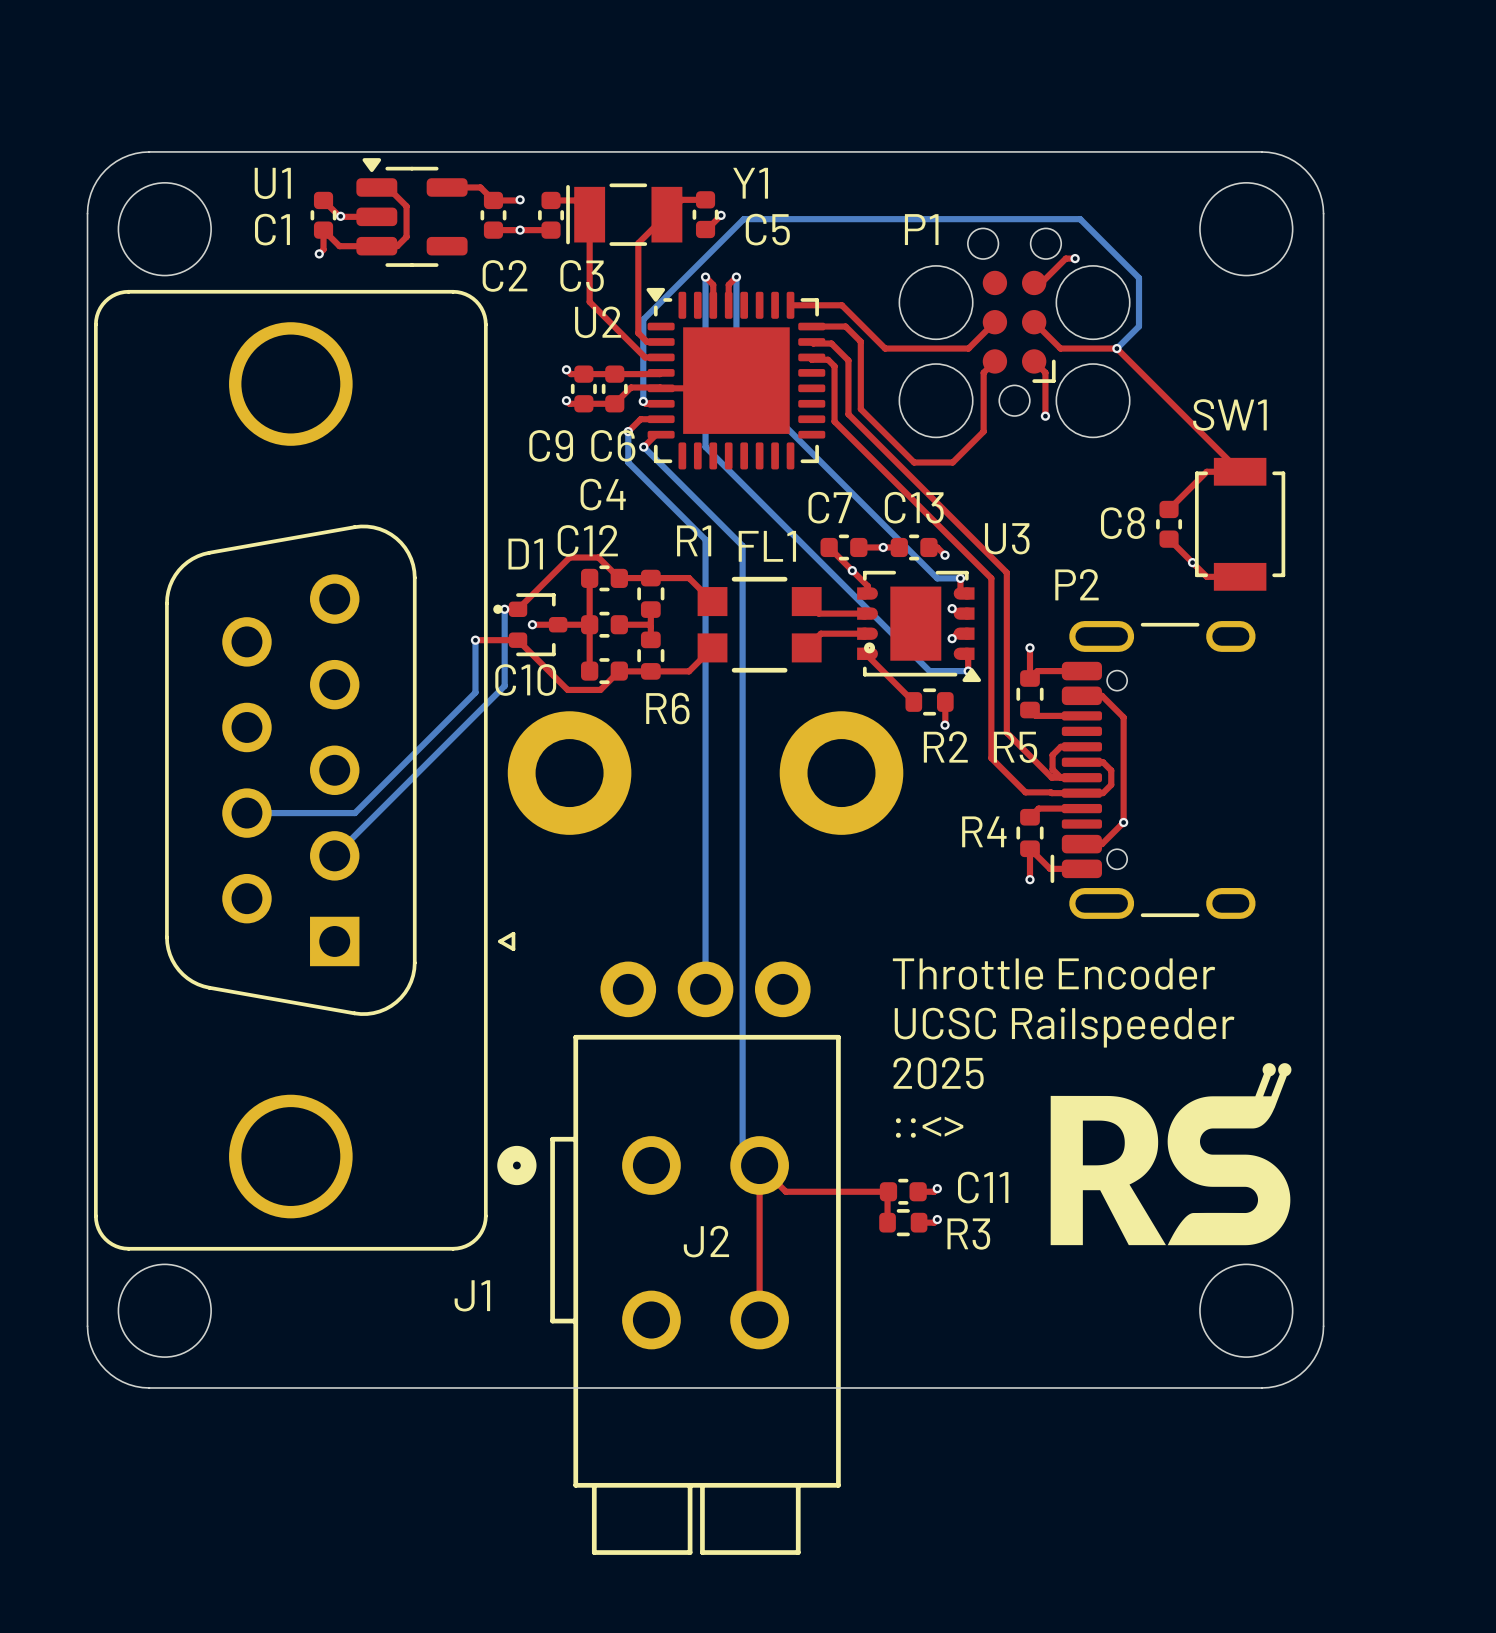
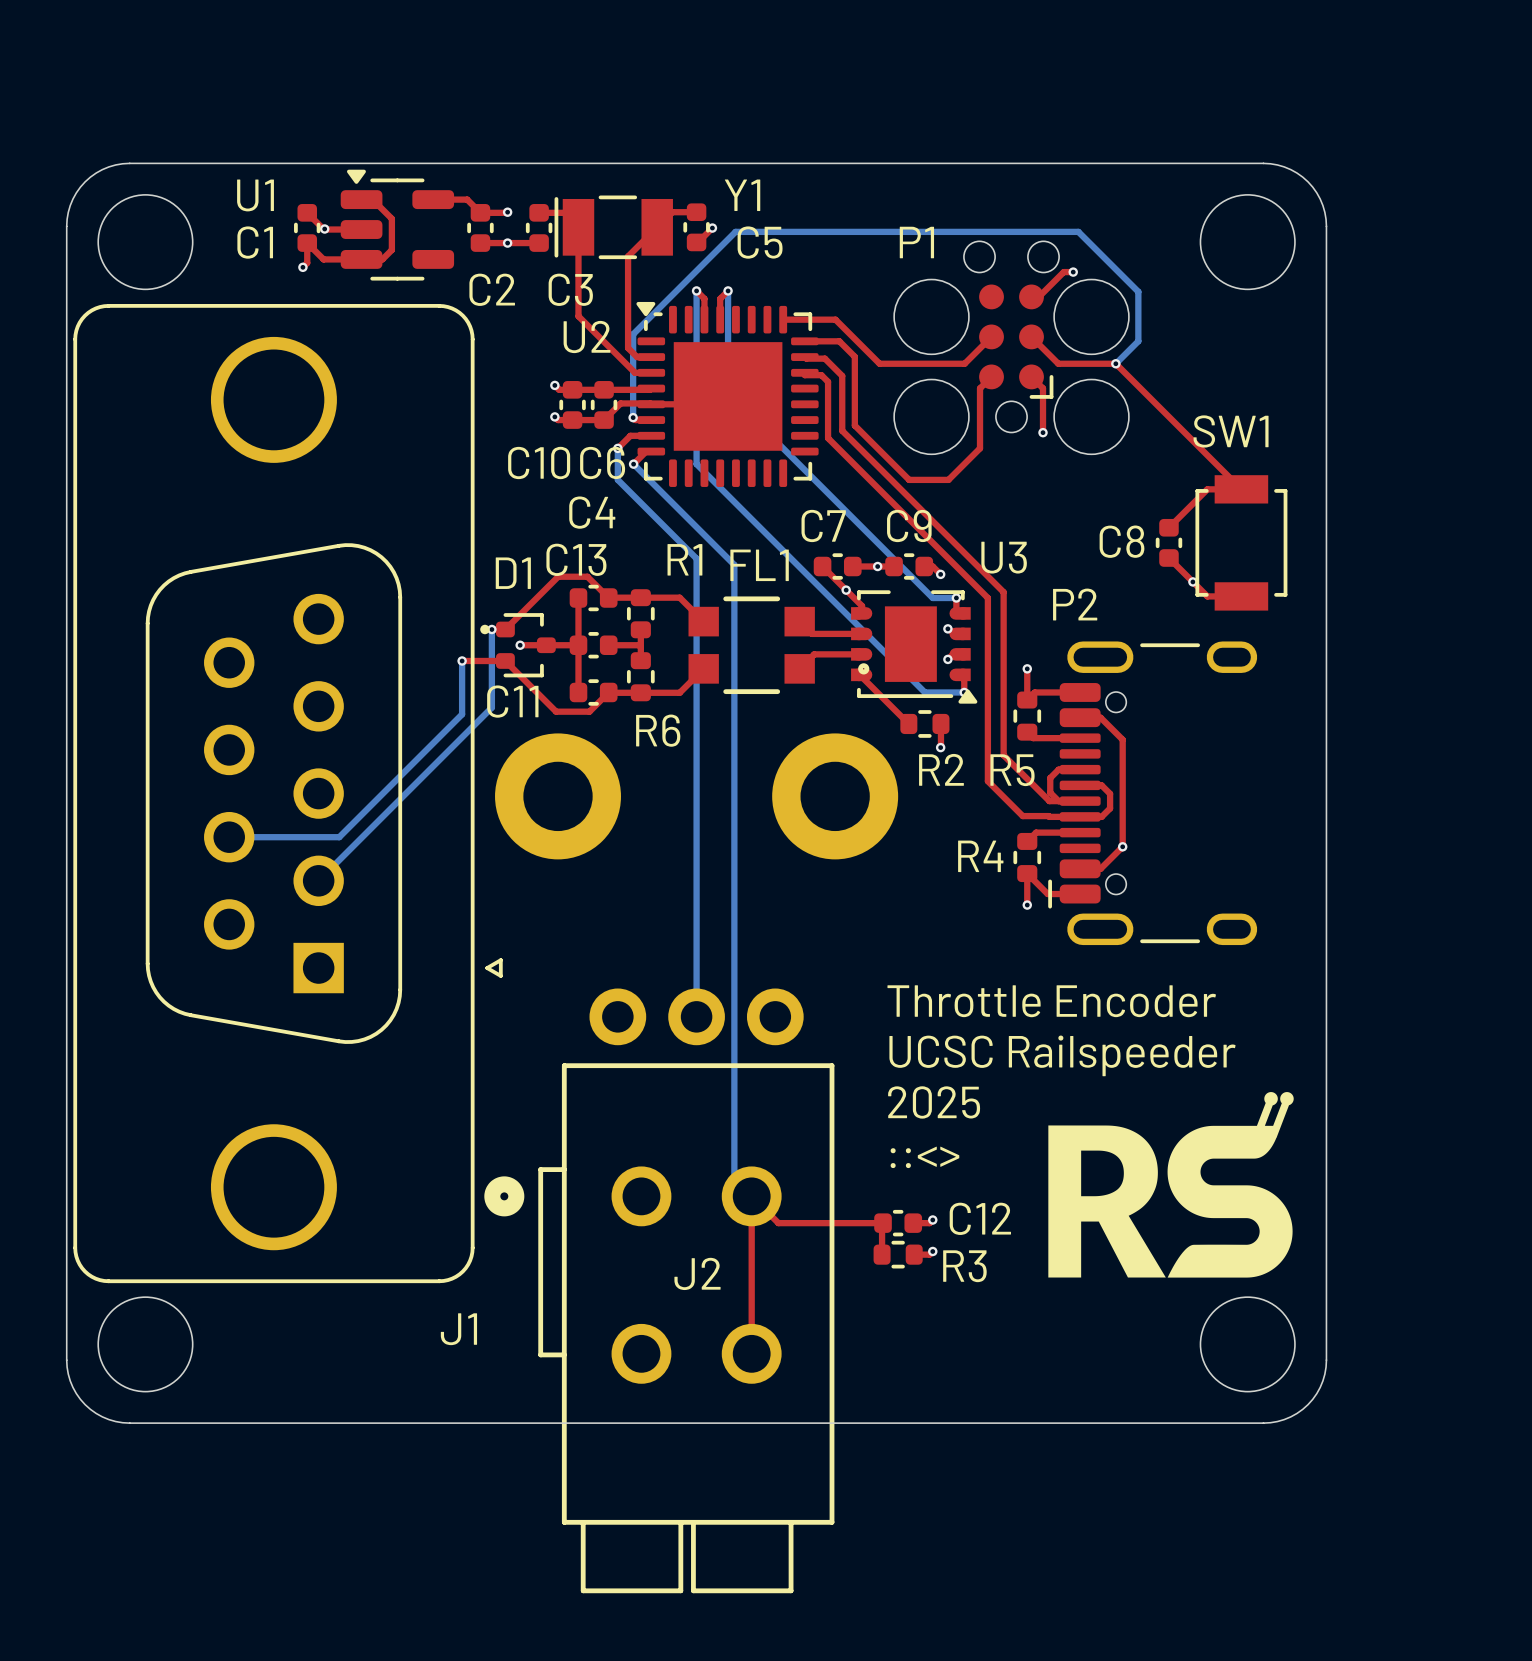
C9 name: C9 (551, 445) -> C10 (539, 462)
C13 name: C13 (914, 507) -> C9 (909, 525)
C12 name: C12 (587, 540) -> C13 (576, 559)
C10 name: C10 (525, 679) -> C11 (512, 701)
C11 name: C11 (983, 1187) -> C12 (980, 1218)

